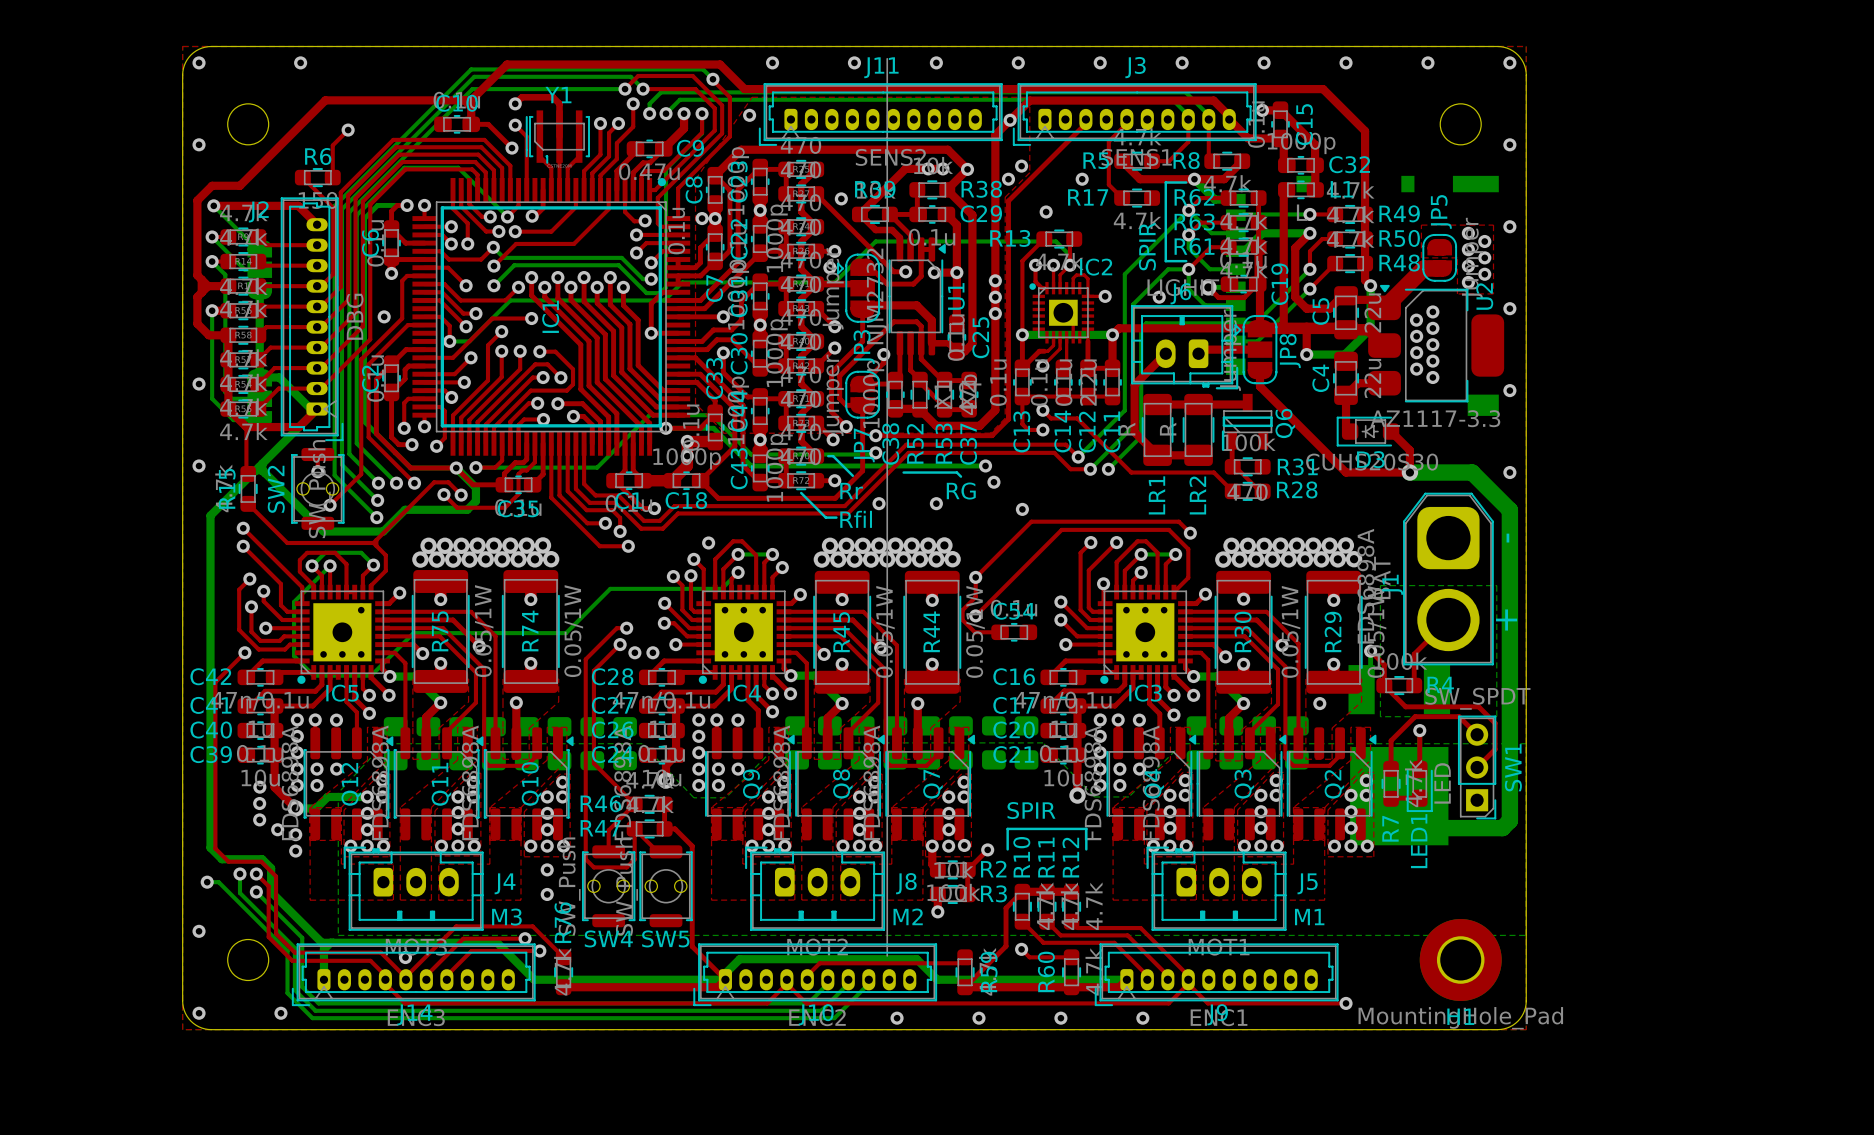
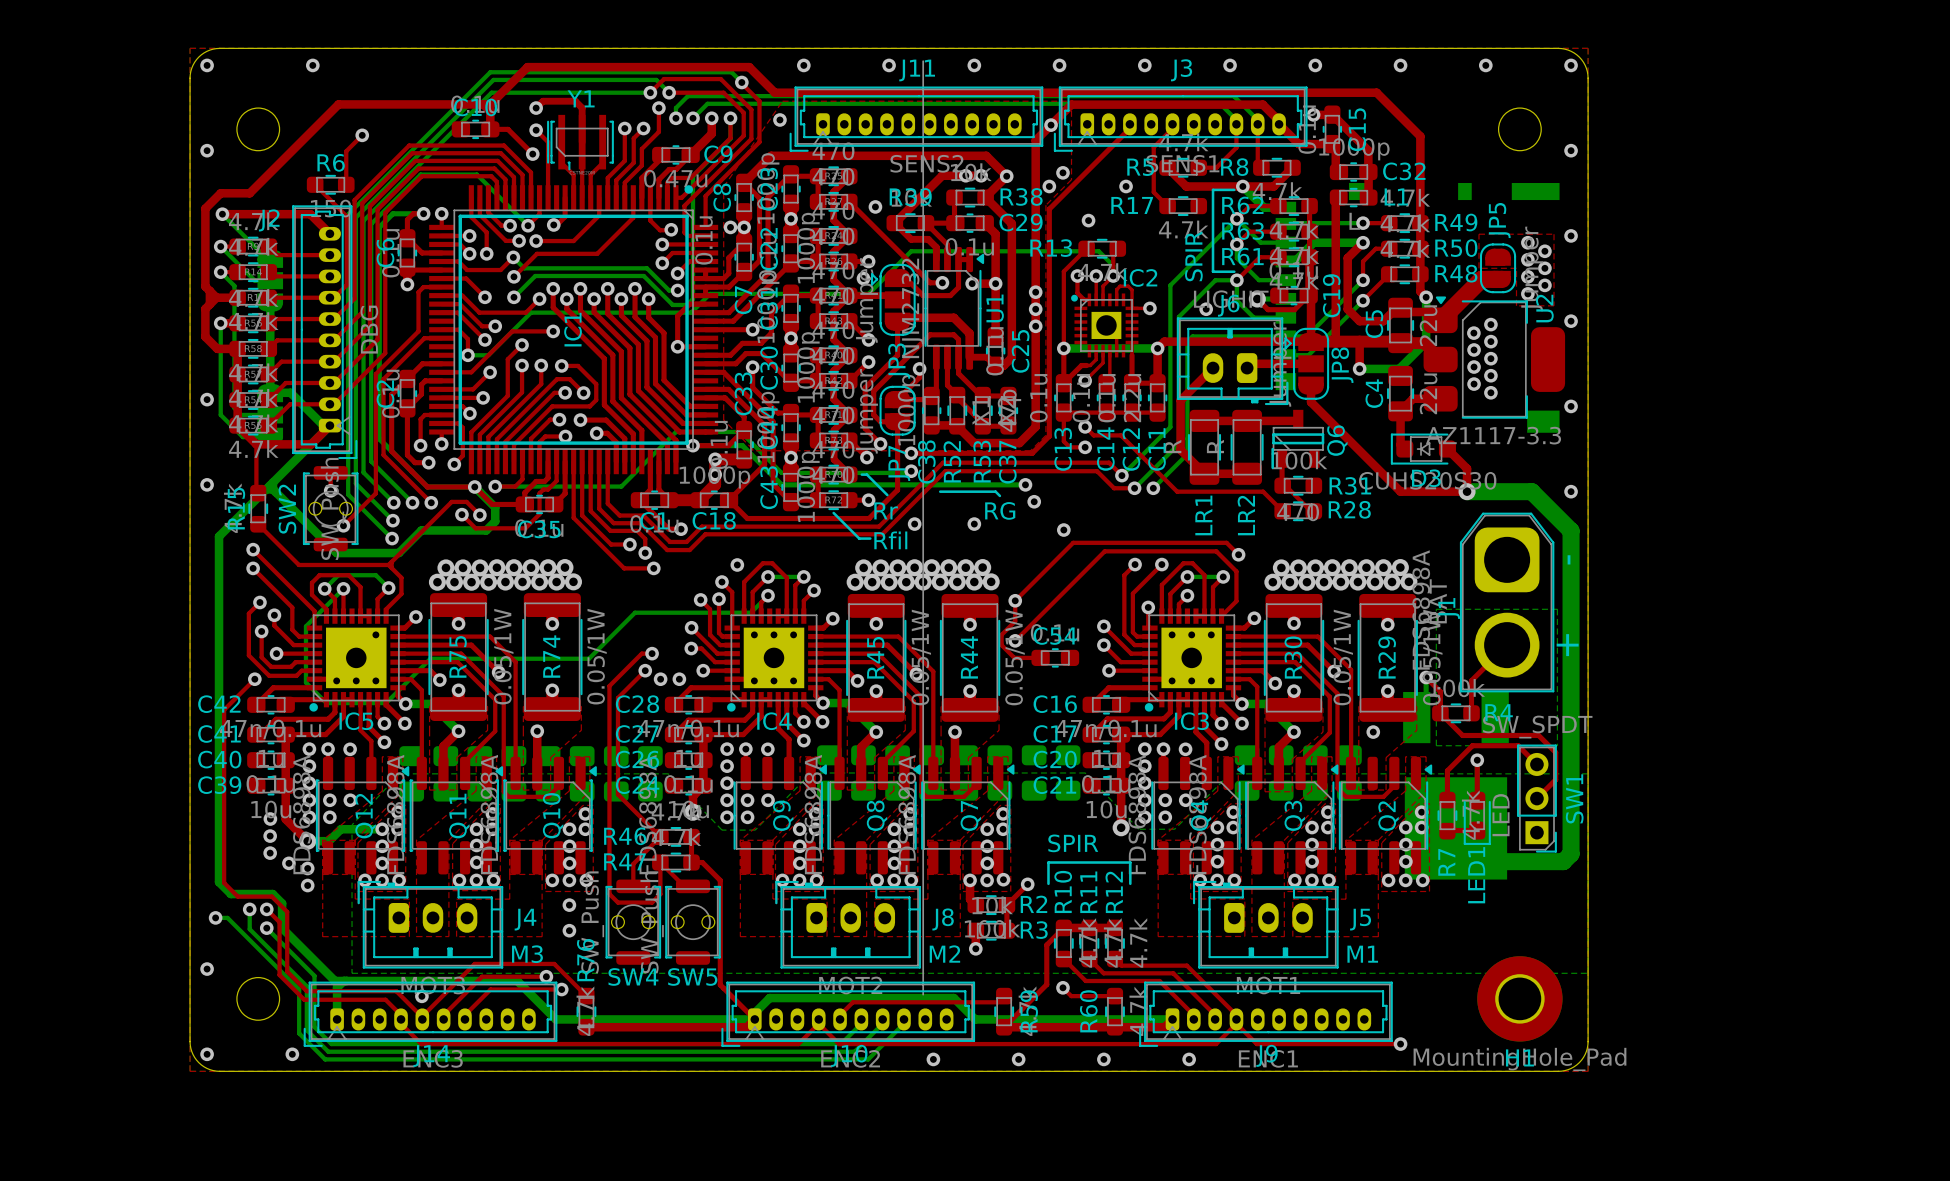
via: (384, 316) -> none

